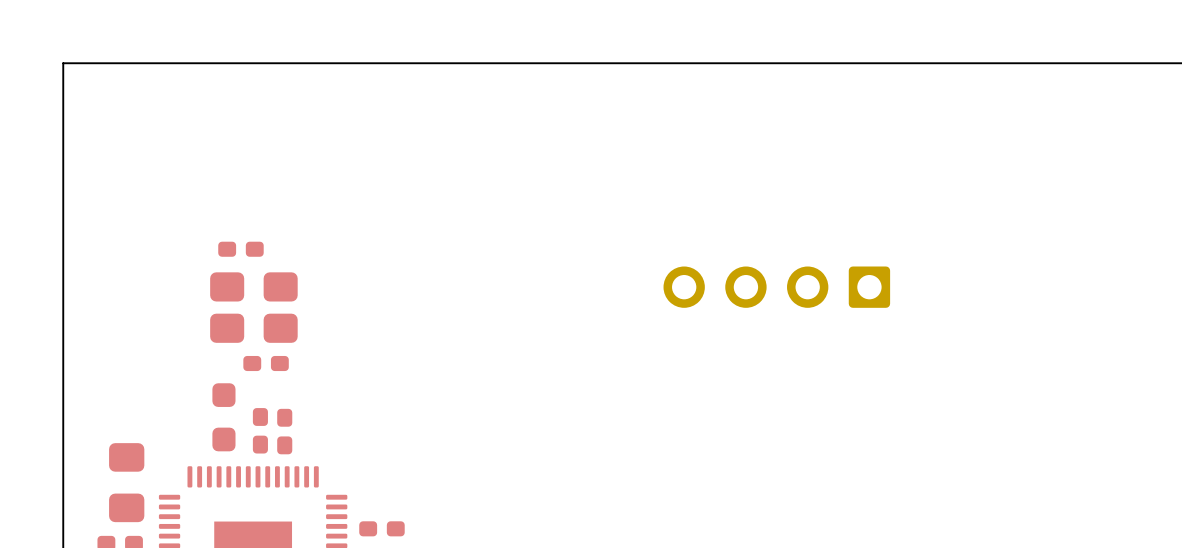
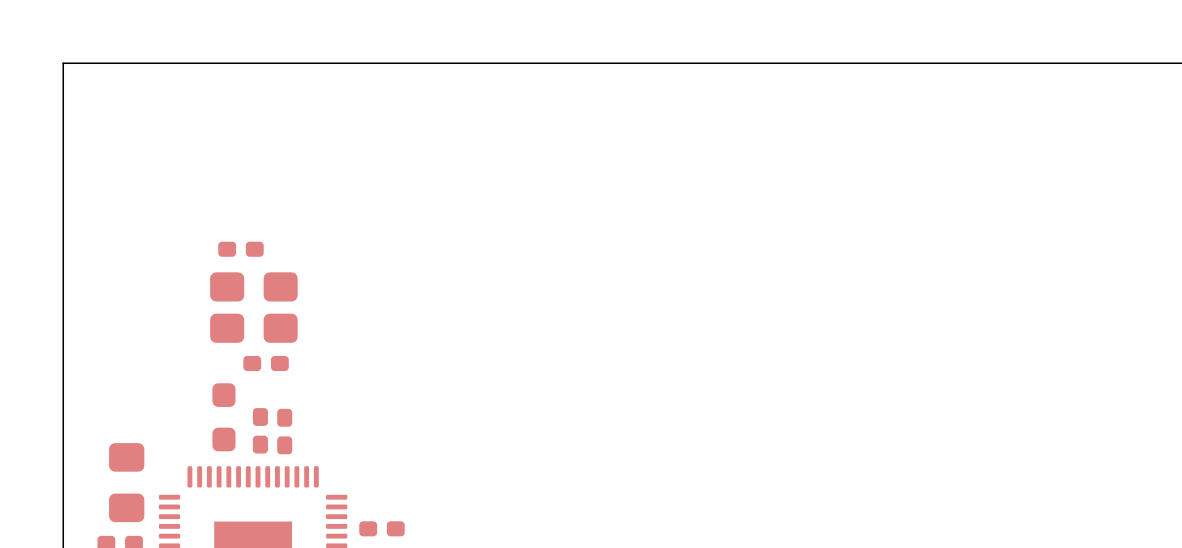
part: (776, 287) -> none

